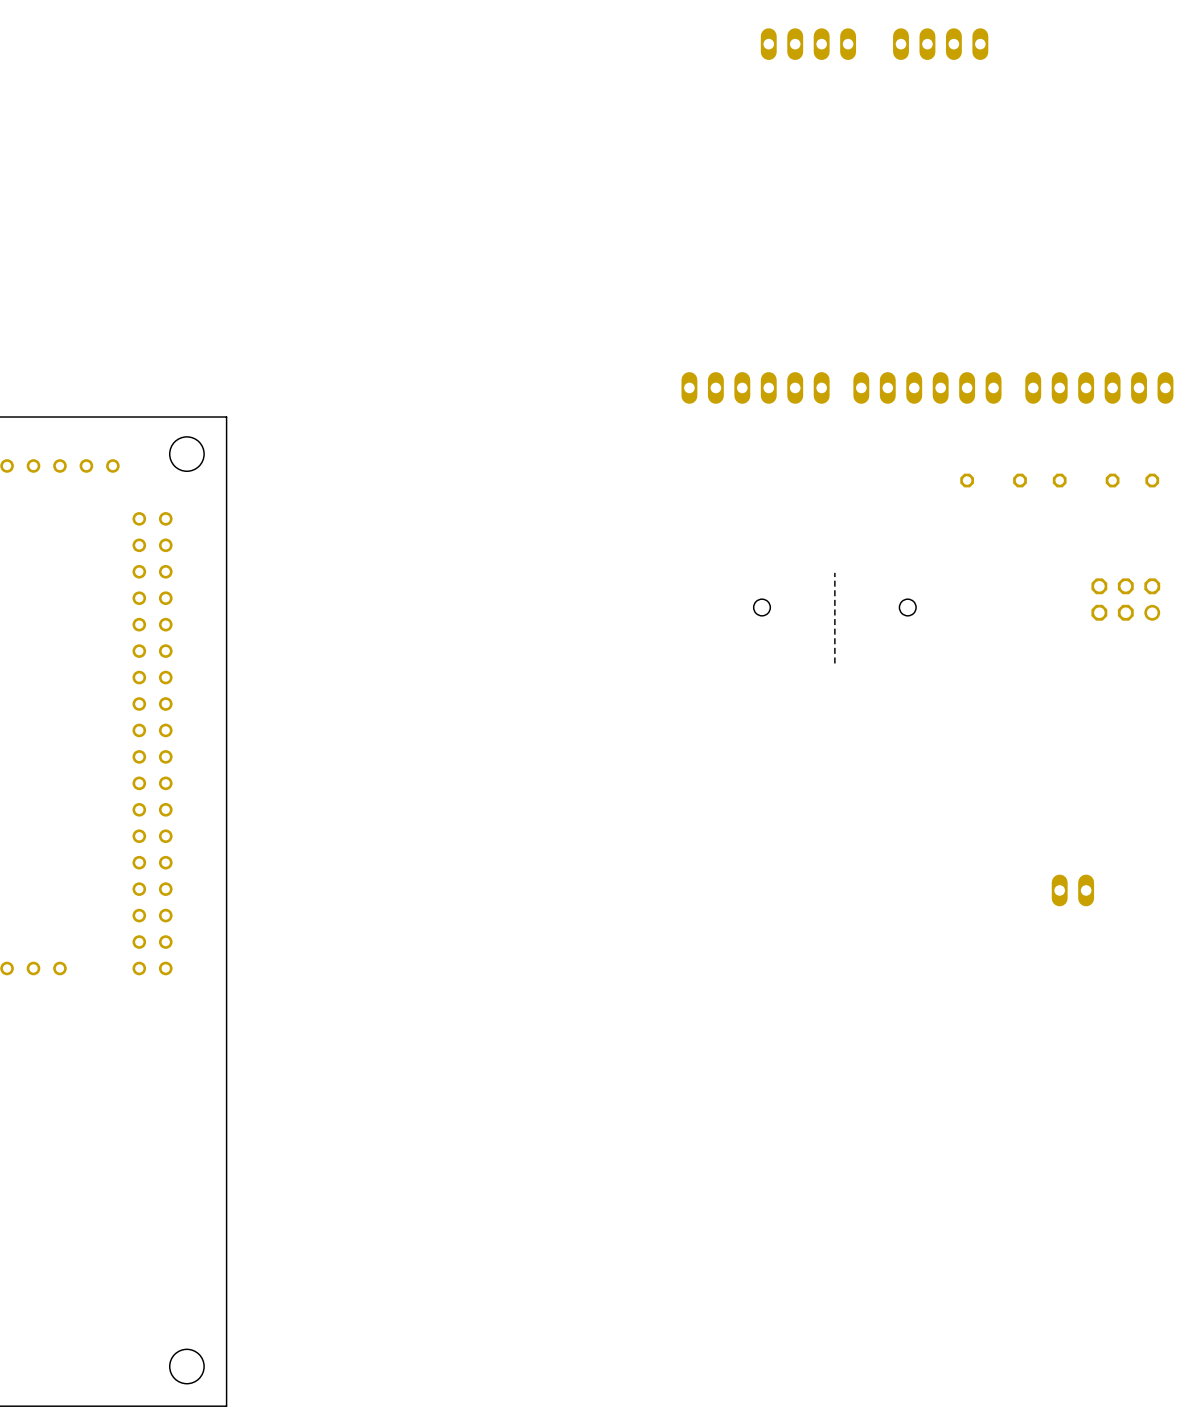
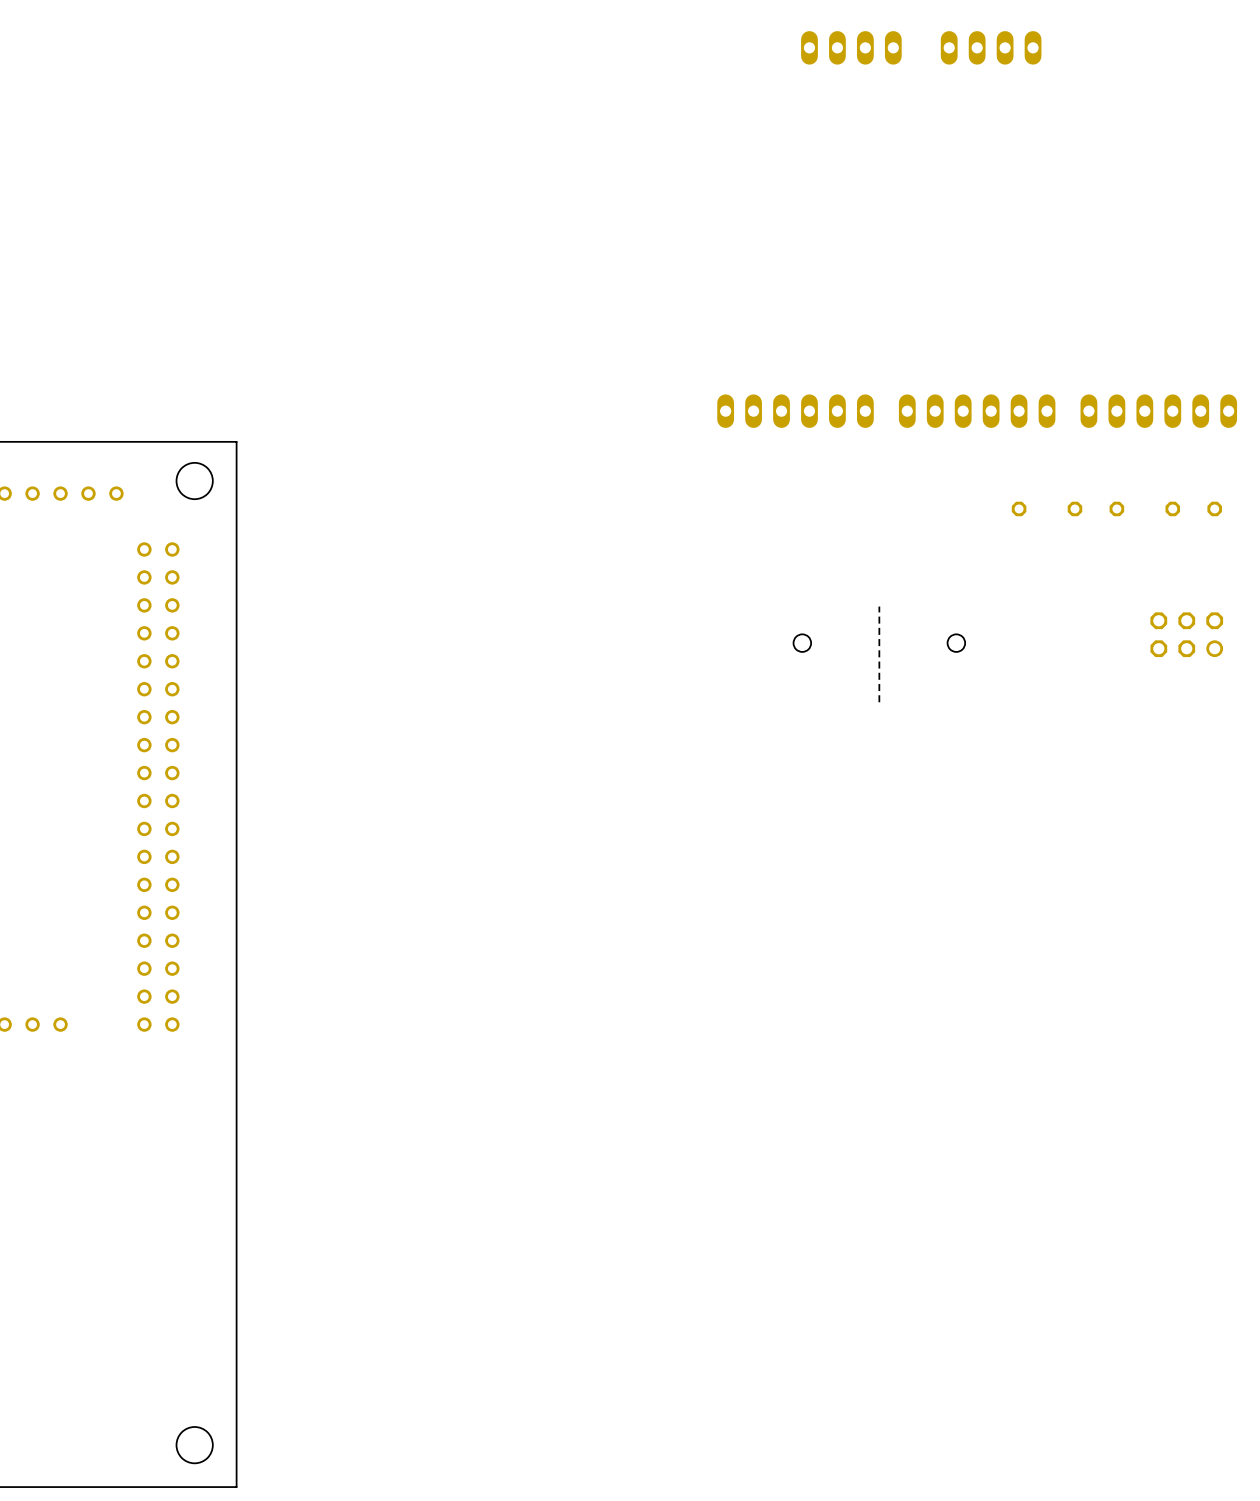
part: (1072, 890) -> none

